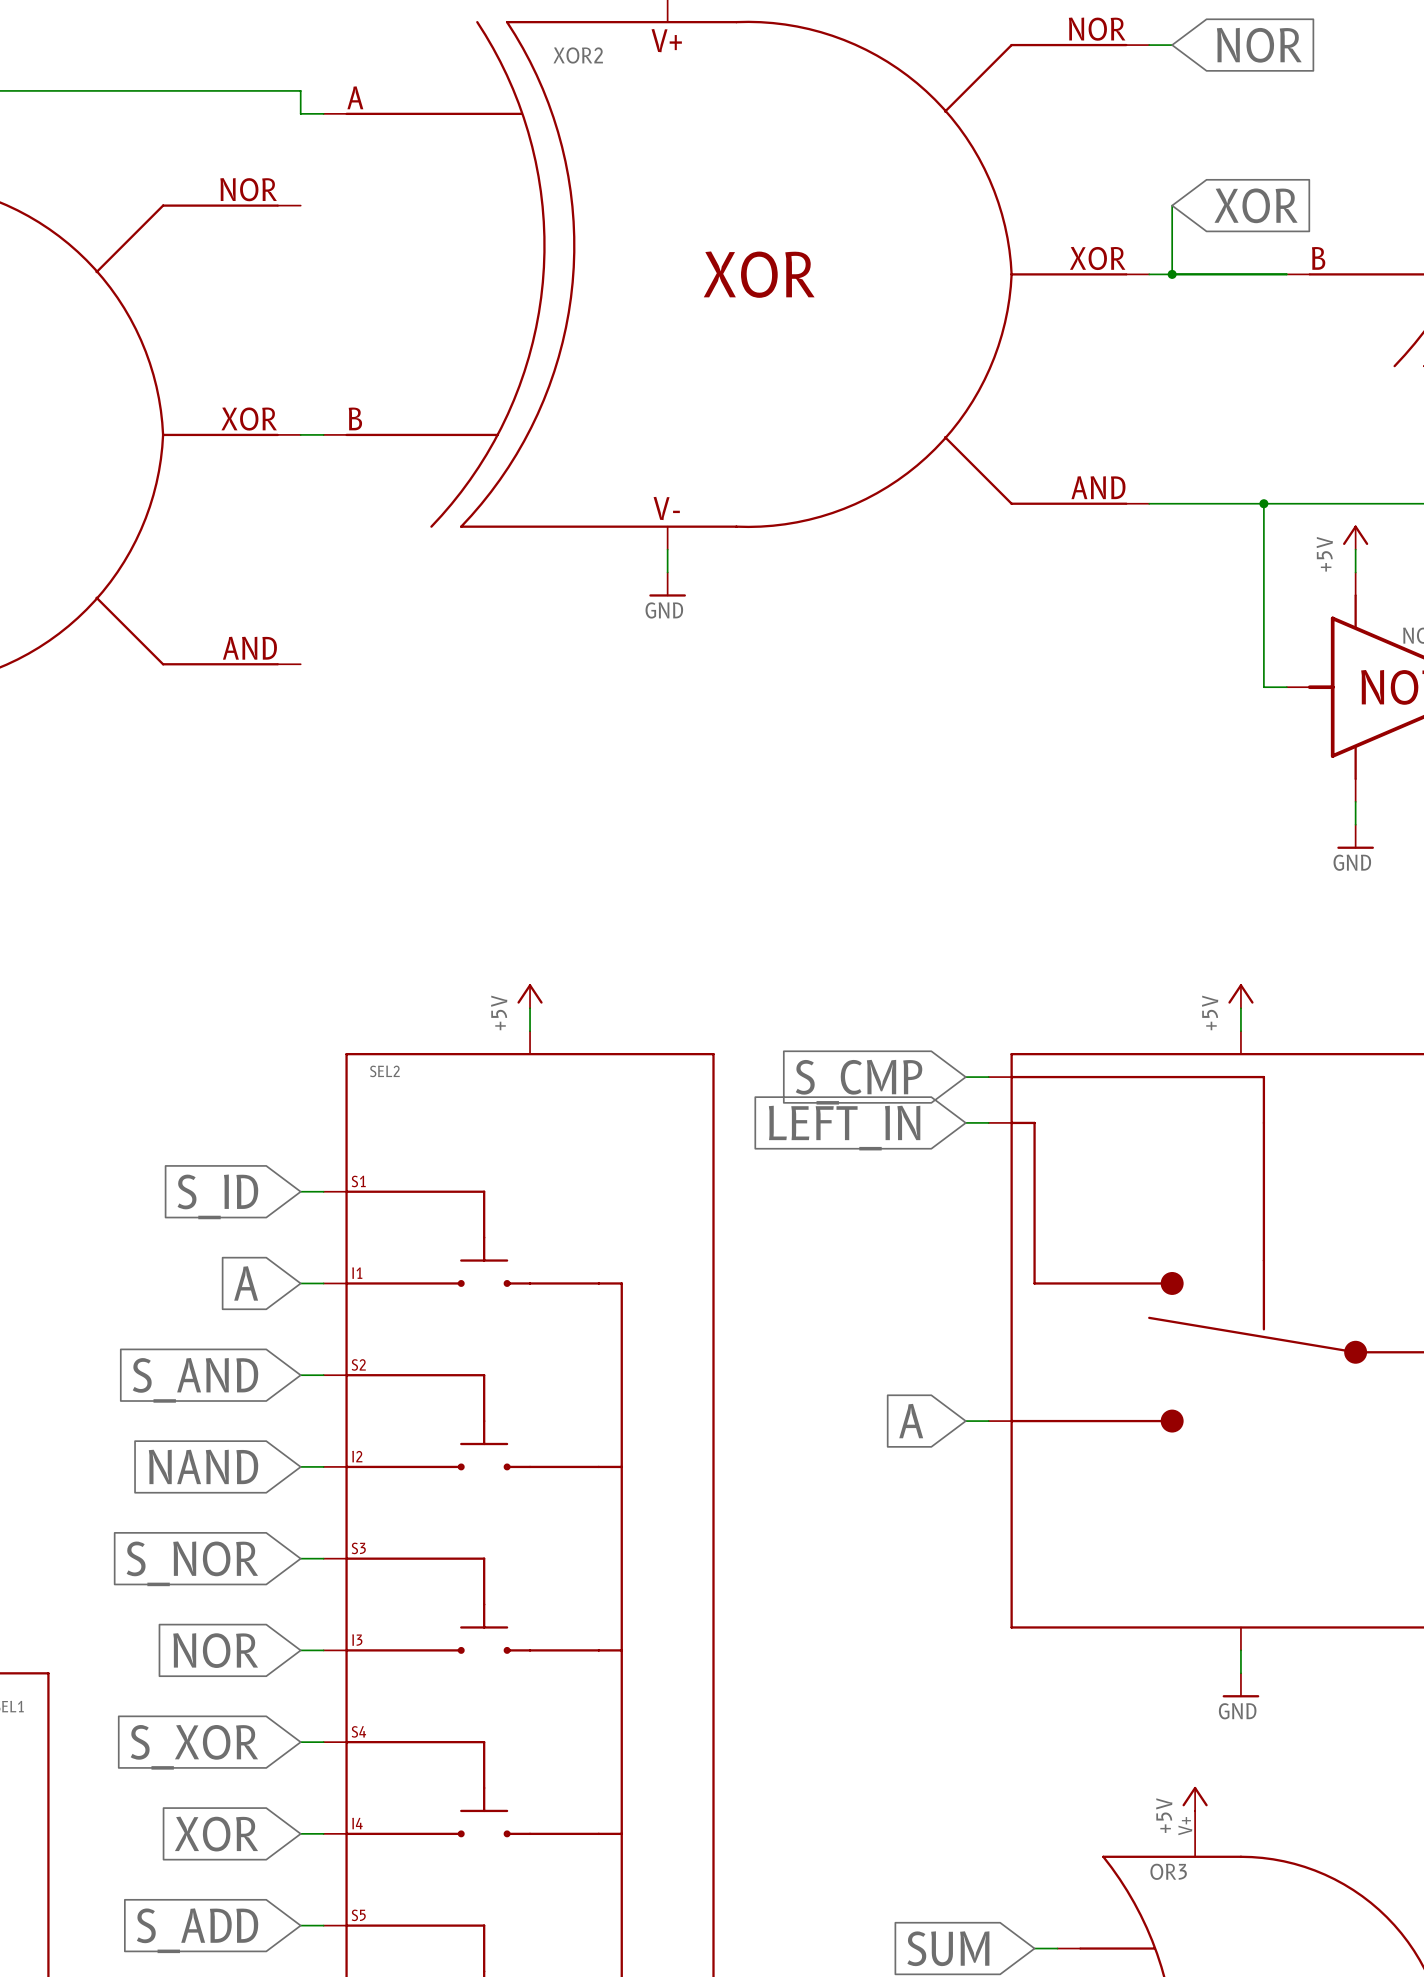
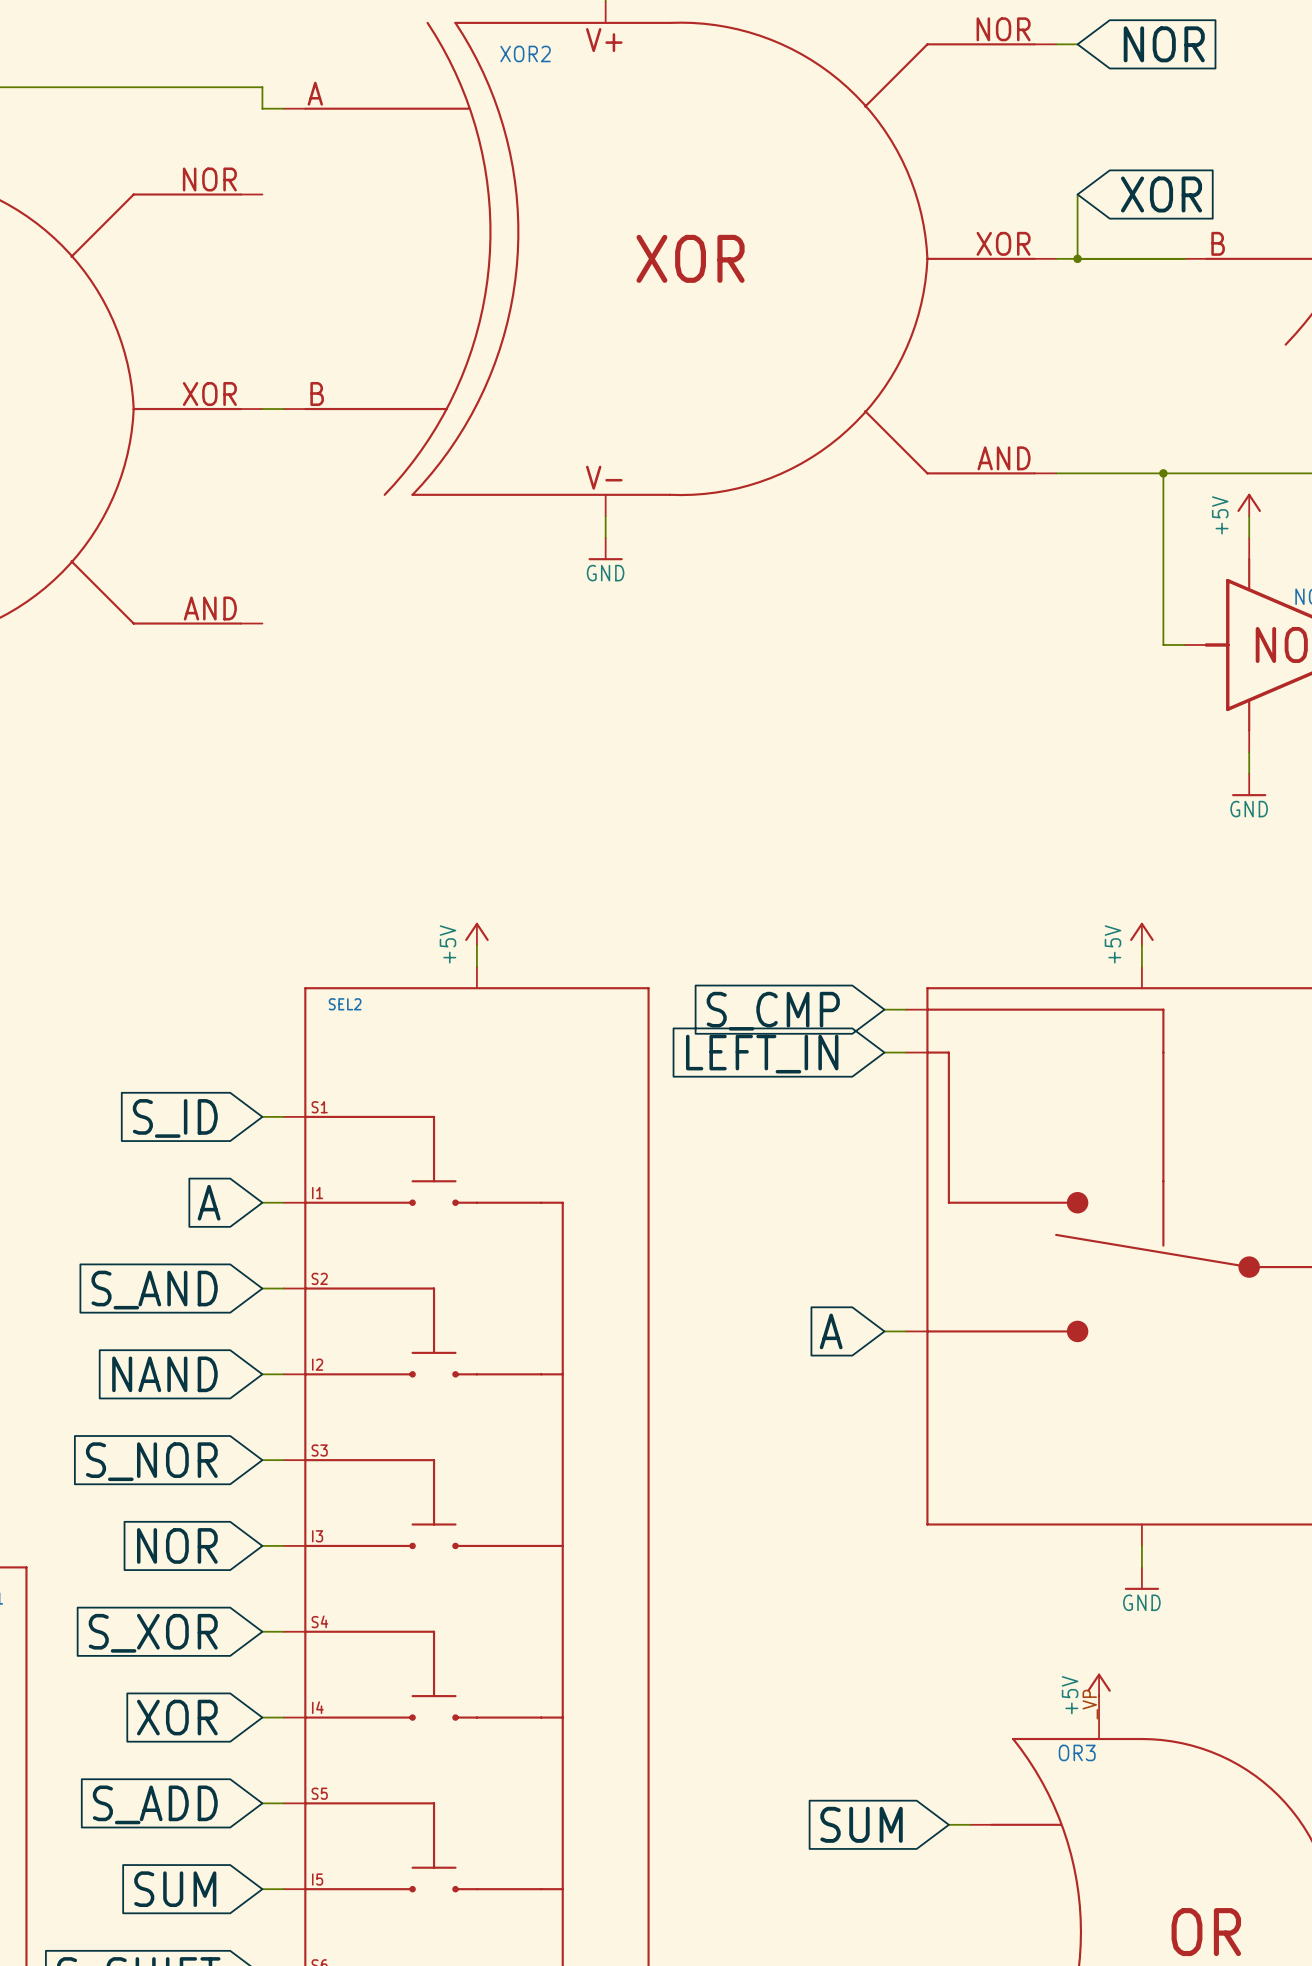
OR3 pin number: V+ (1185, 1826) -> _VP (1090, 1704)

